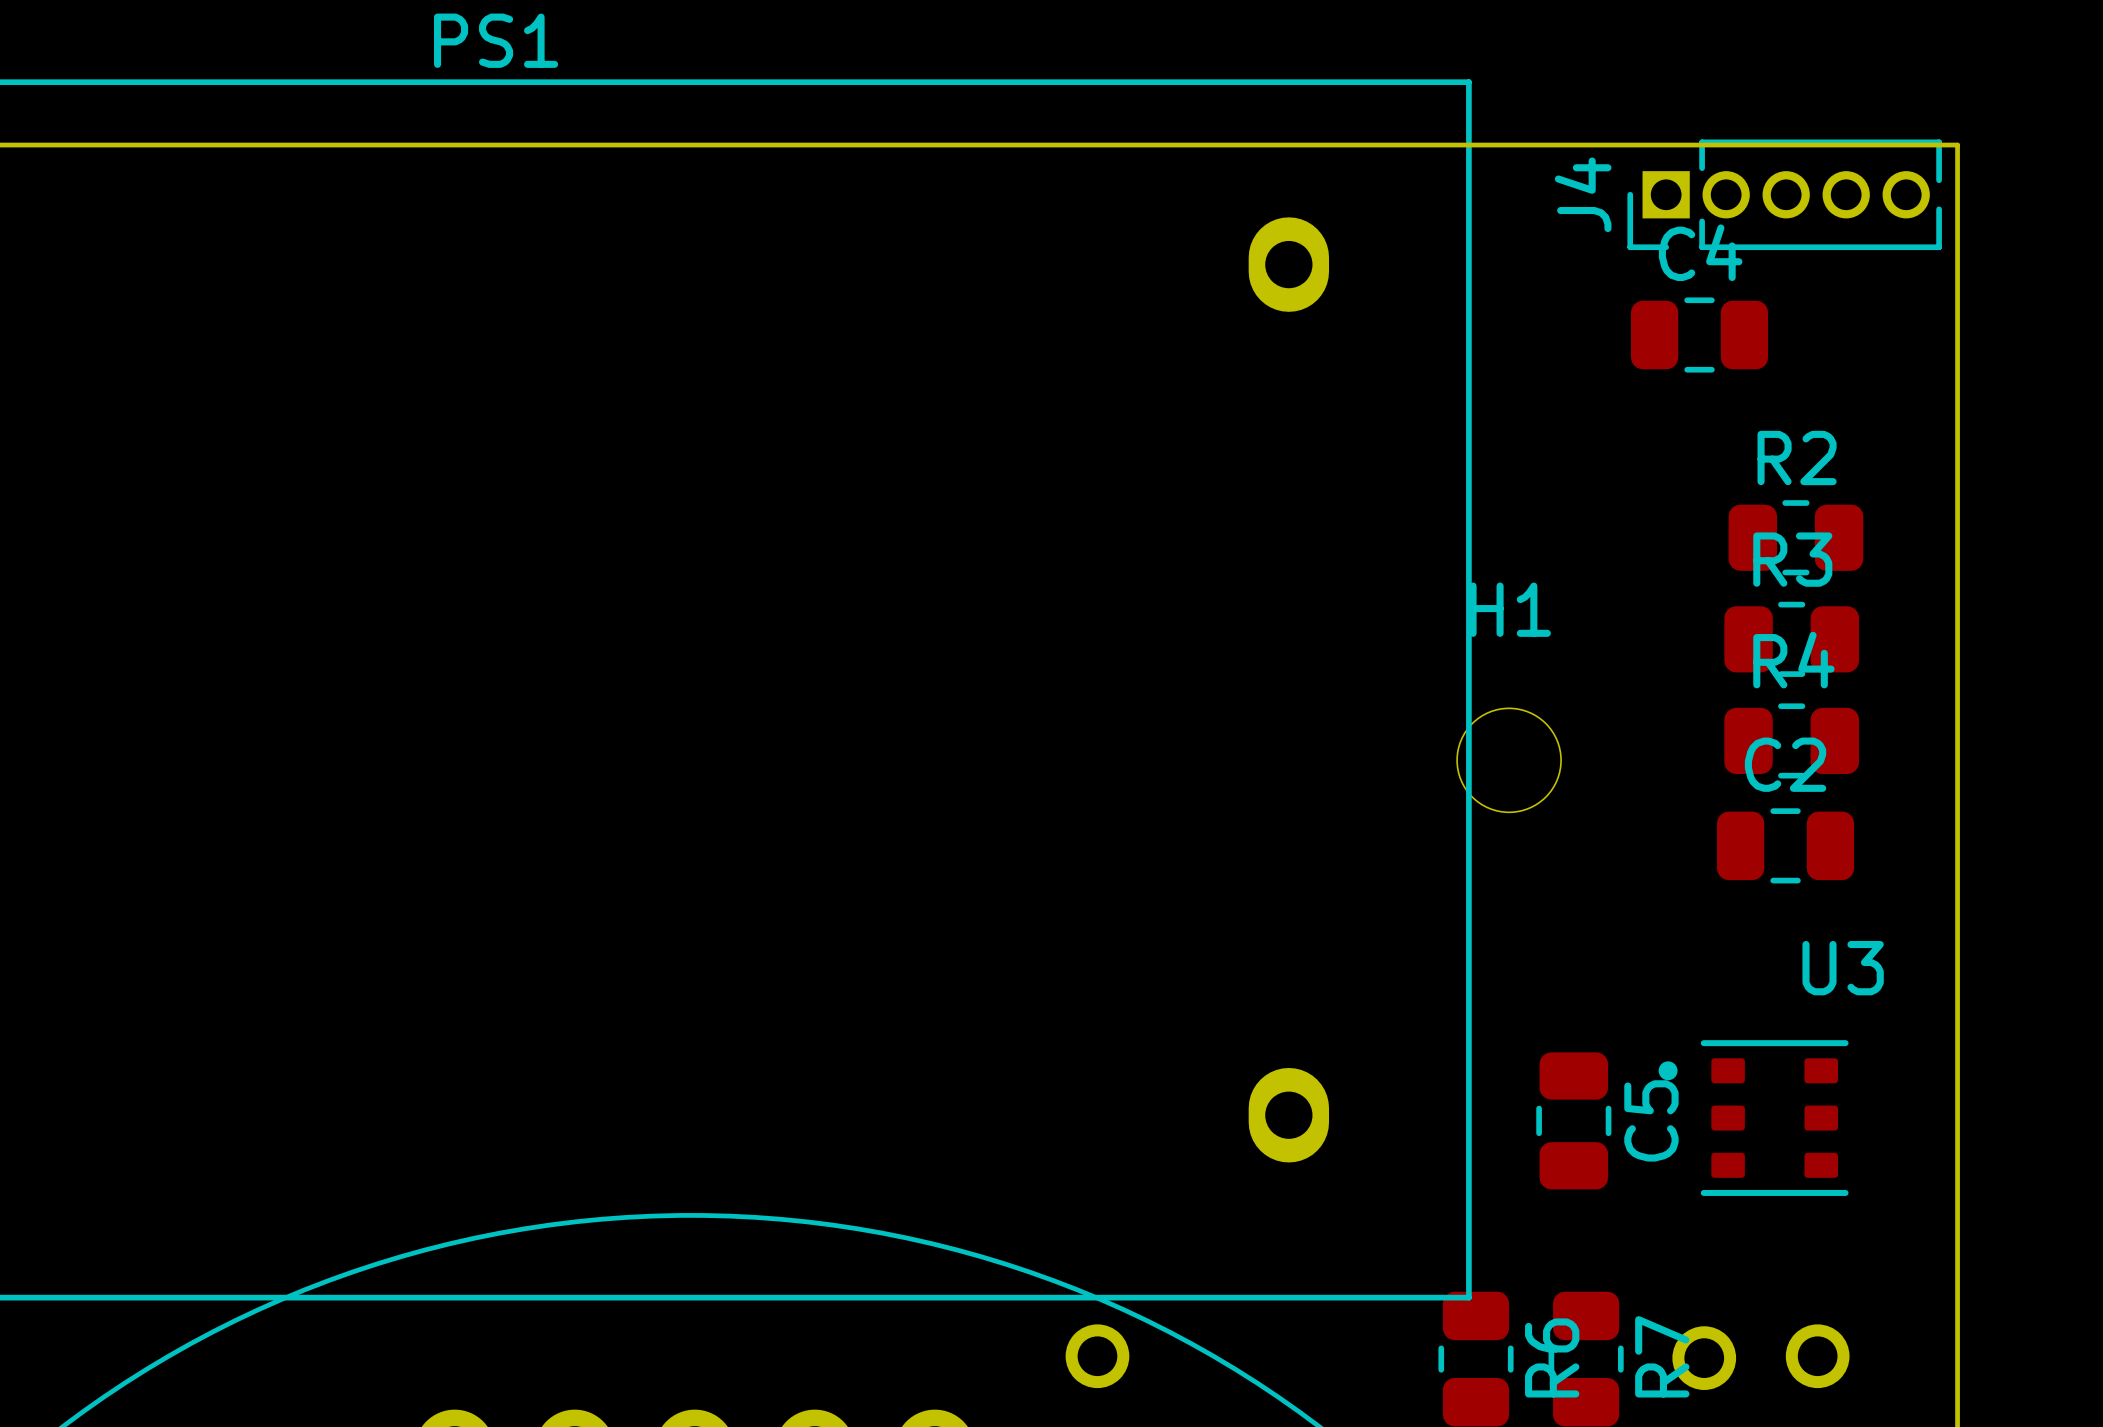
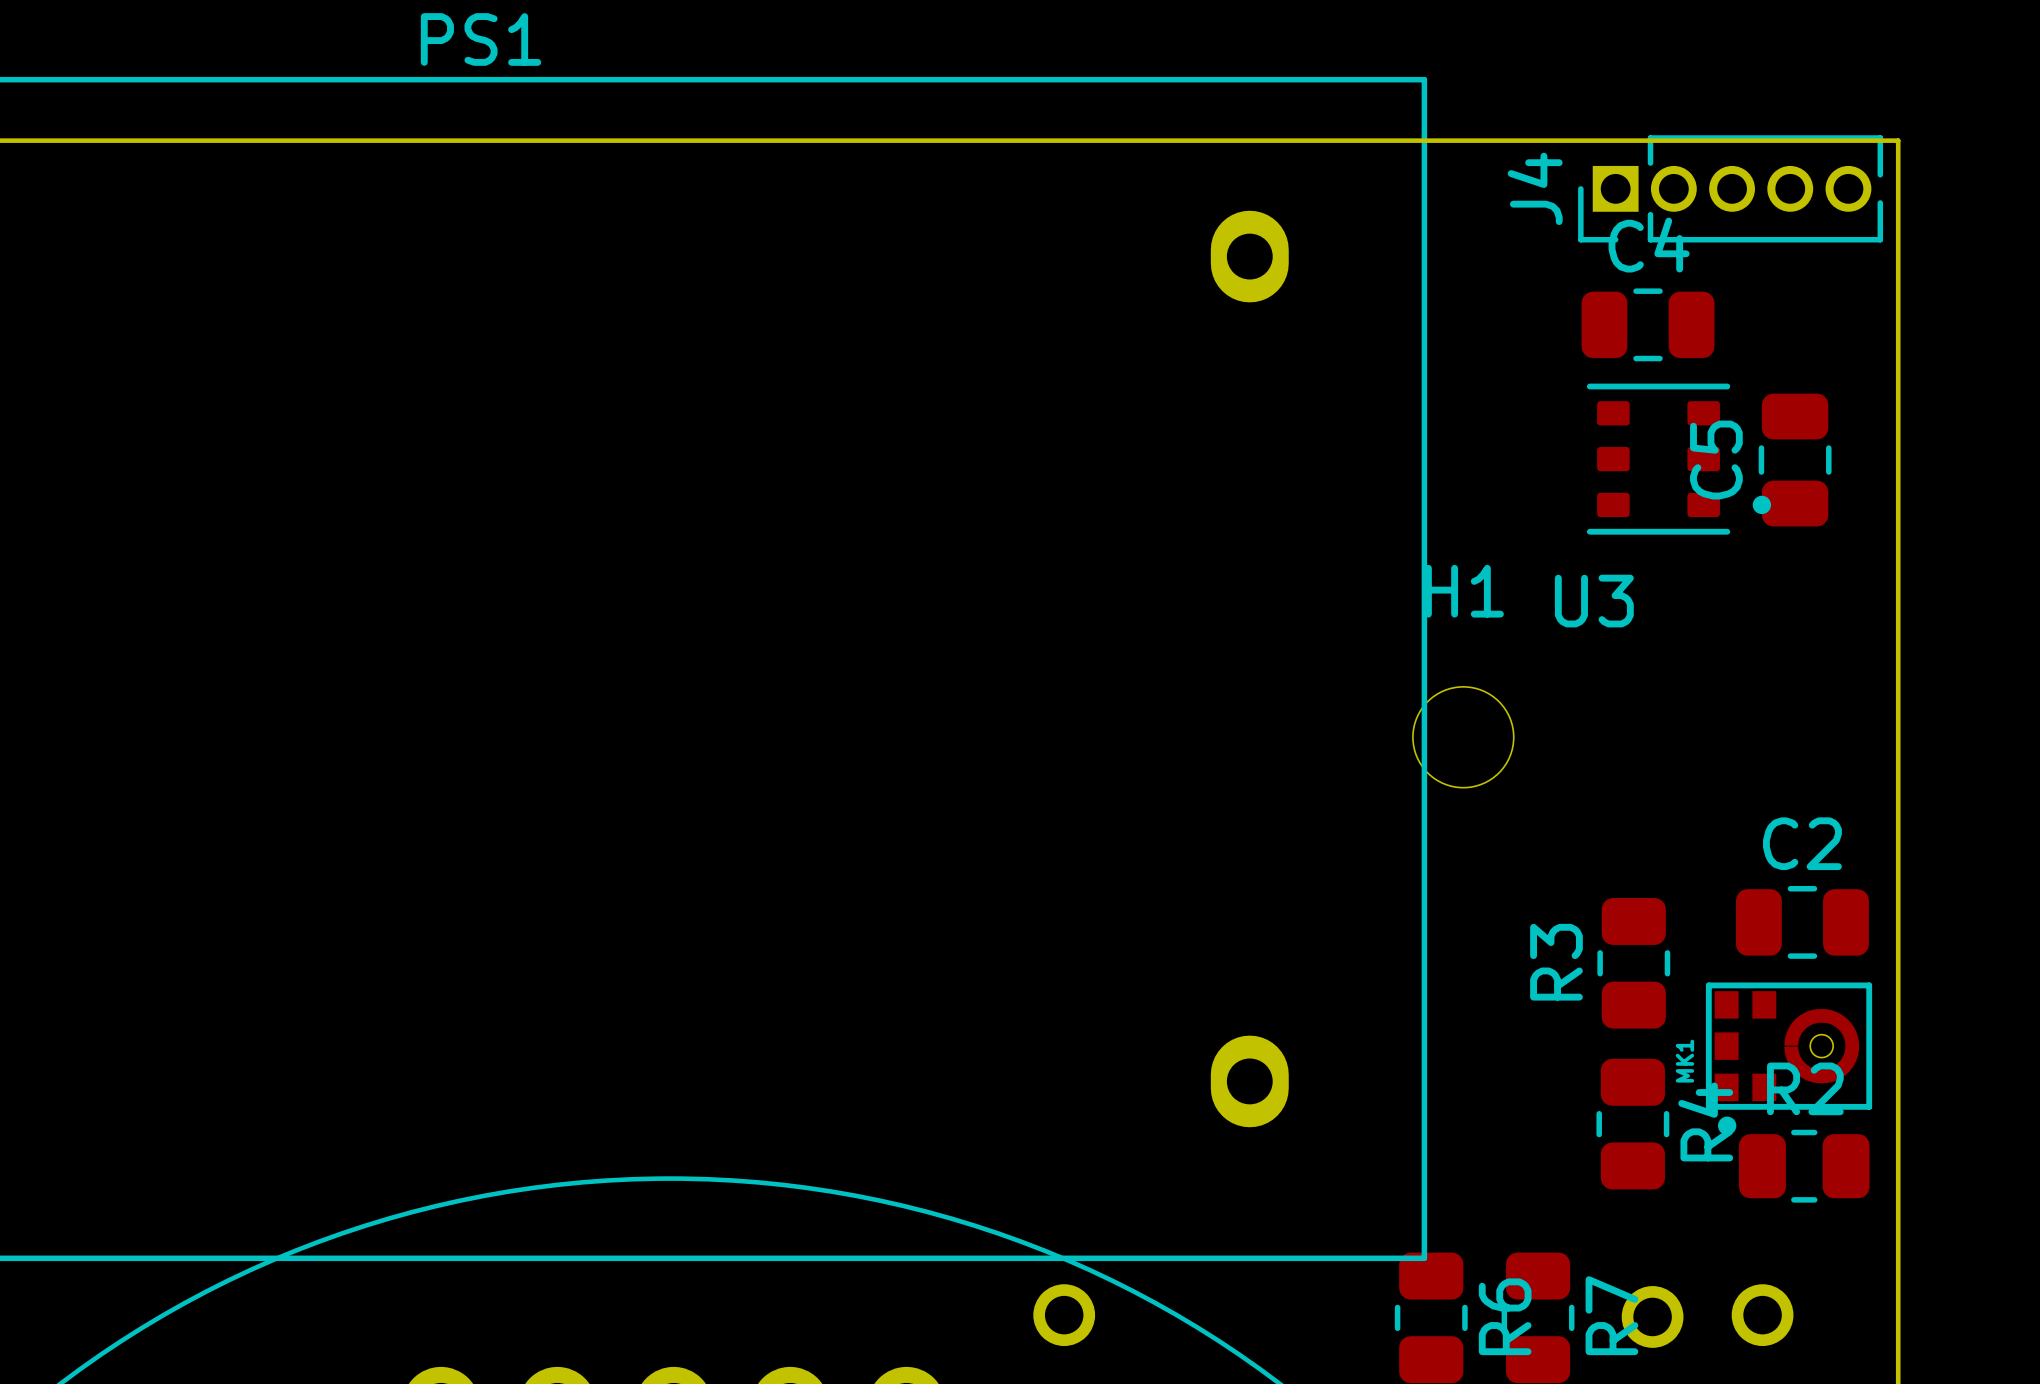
R2 position: (1795, 537) -> (1804, 1166)
R3 name position: R3 (1792, 559) -> R3 (1556, 962)
R3 rotation: 0° (1791, 639) -> 90° clockwise (1633, 963)
R3 position: (1791, 639) -> (1633, 963)
R4 rotation: 0° (1791, 740) -> 90° clockwise (1632, 1124)
R4 position: (1791, 740) -> (1632, 1124)
C2 position: (1785, 845) -> (1802, 922)
MK1: none -> (1789, 1058)
U3 rotation: 0° (1753, 1118) -> 180° (1678, 459)
U3 position: (1753, 1118) -> (1678, 459)
C5 position: (1573, 1120) -> (1795, 460)
C5 name position: C5 (1651, 1120) -> C5 (1716, 460)

